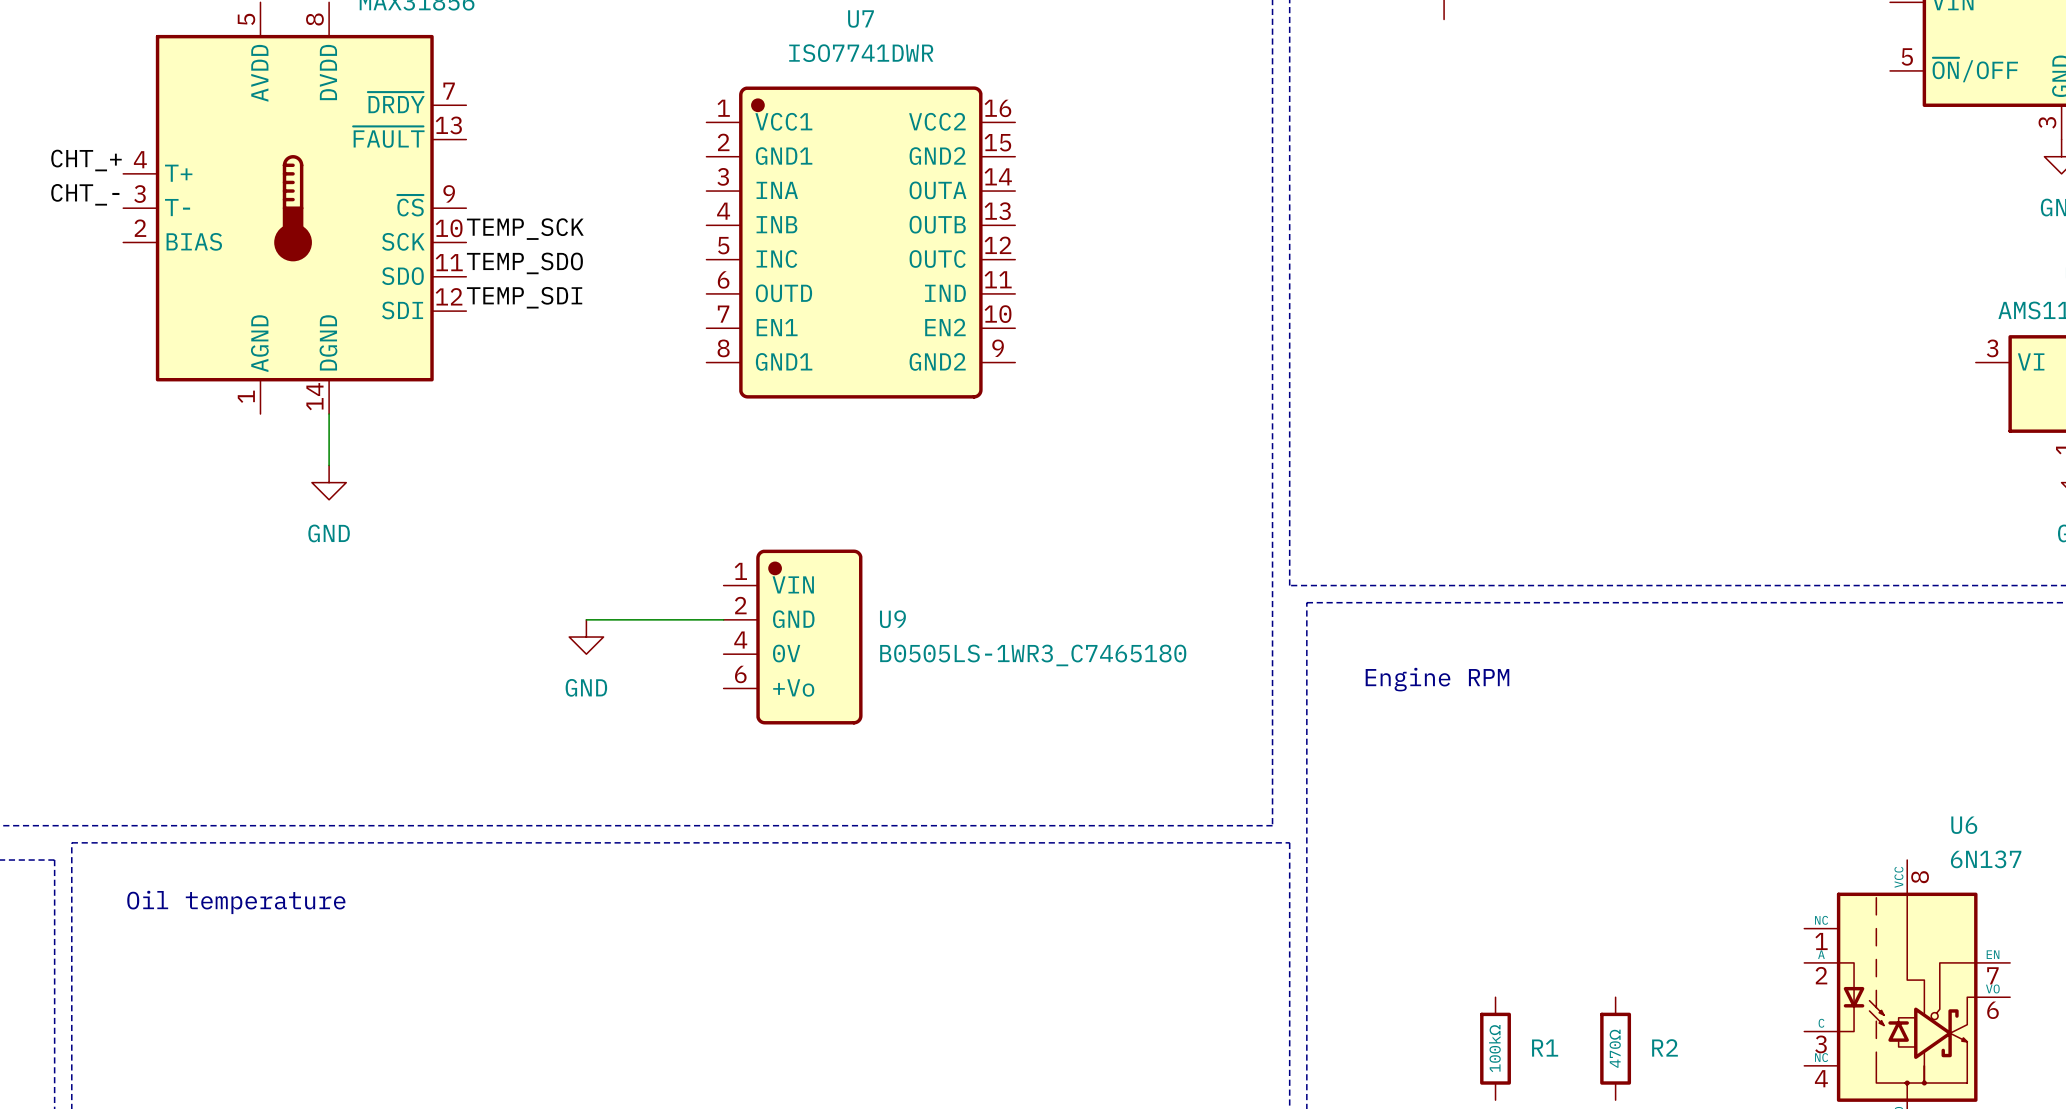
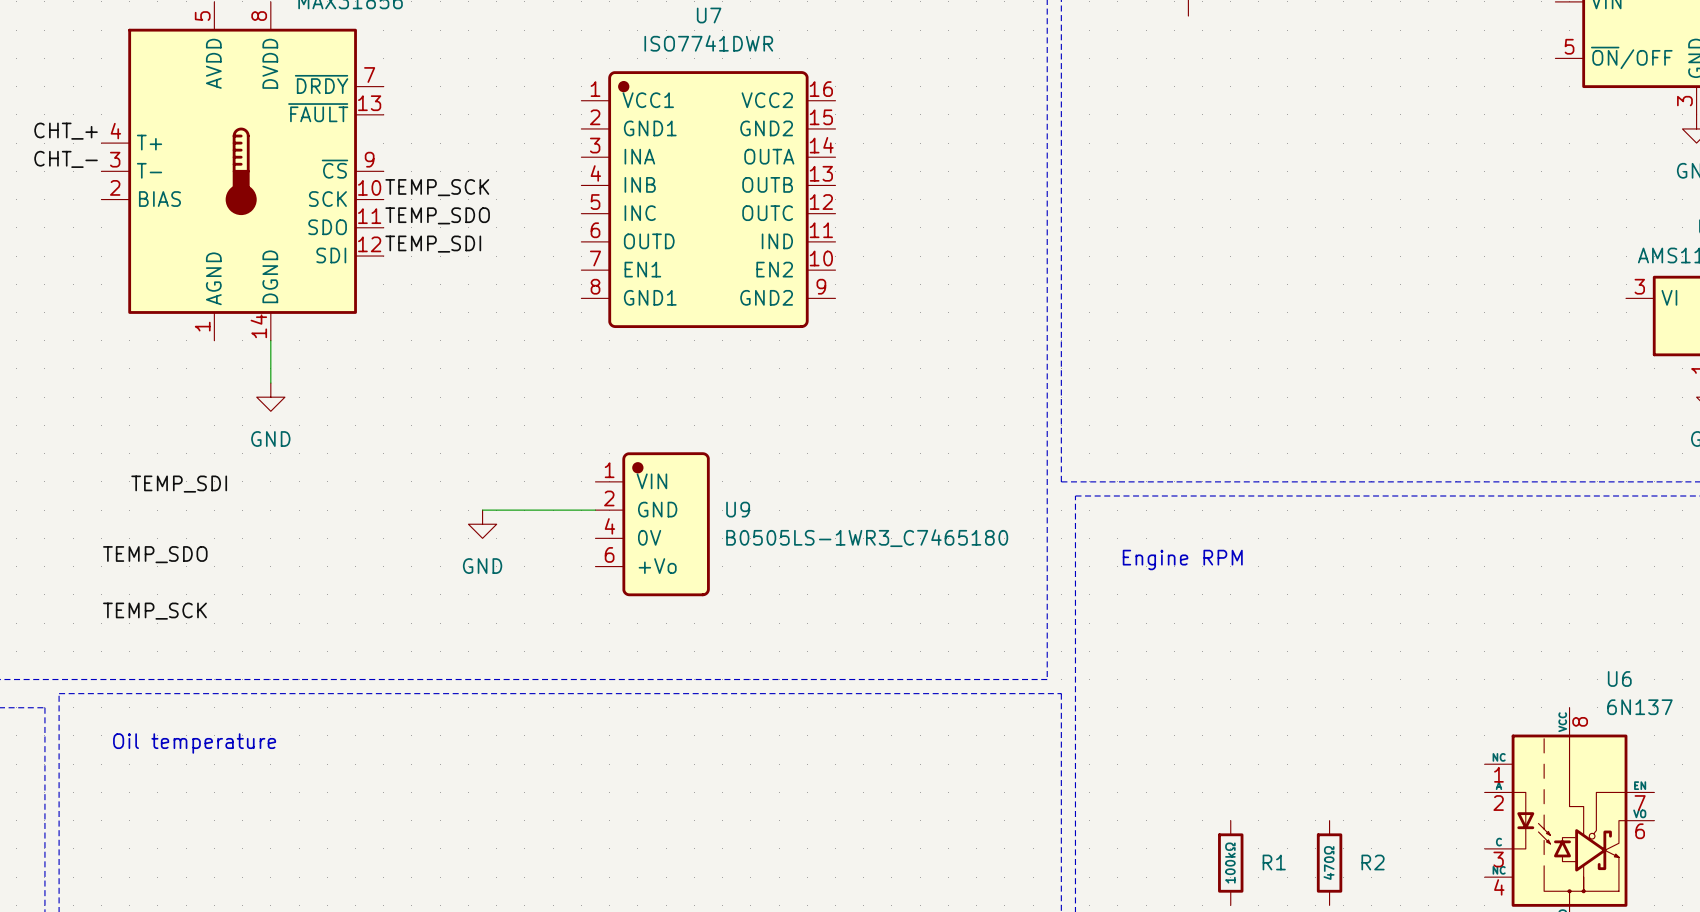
label: none -> TEMP_SDI (179, 484)
label: none -> TEMP_SDO (155, 554)
label: none -> TEMP_SCK (154, 611)

